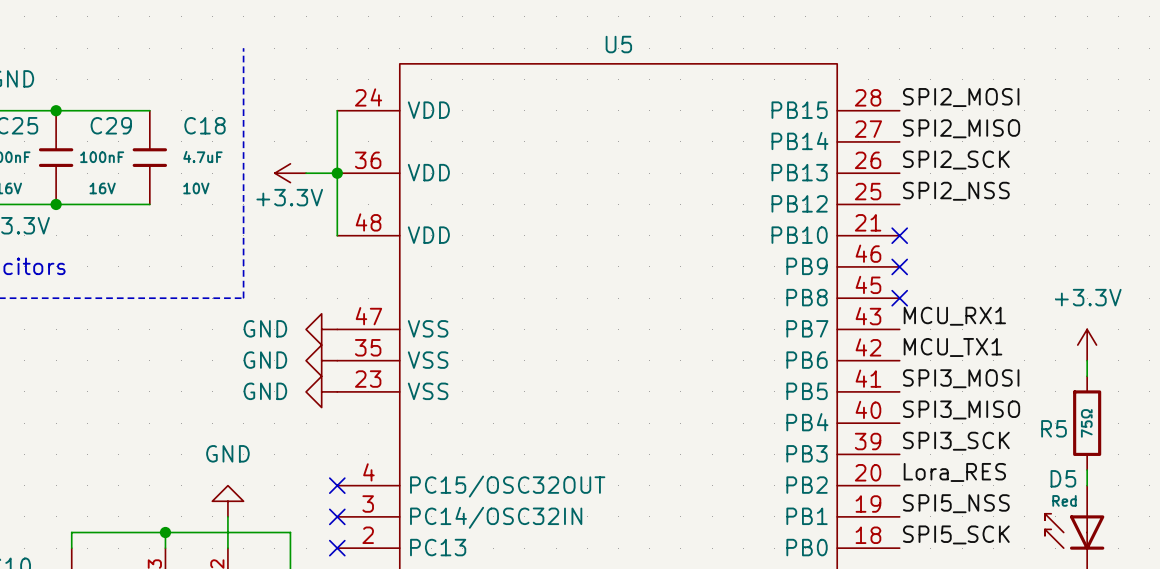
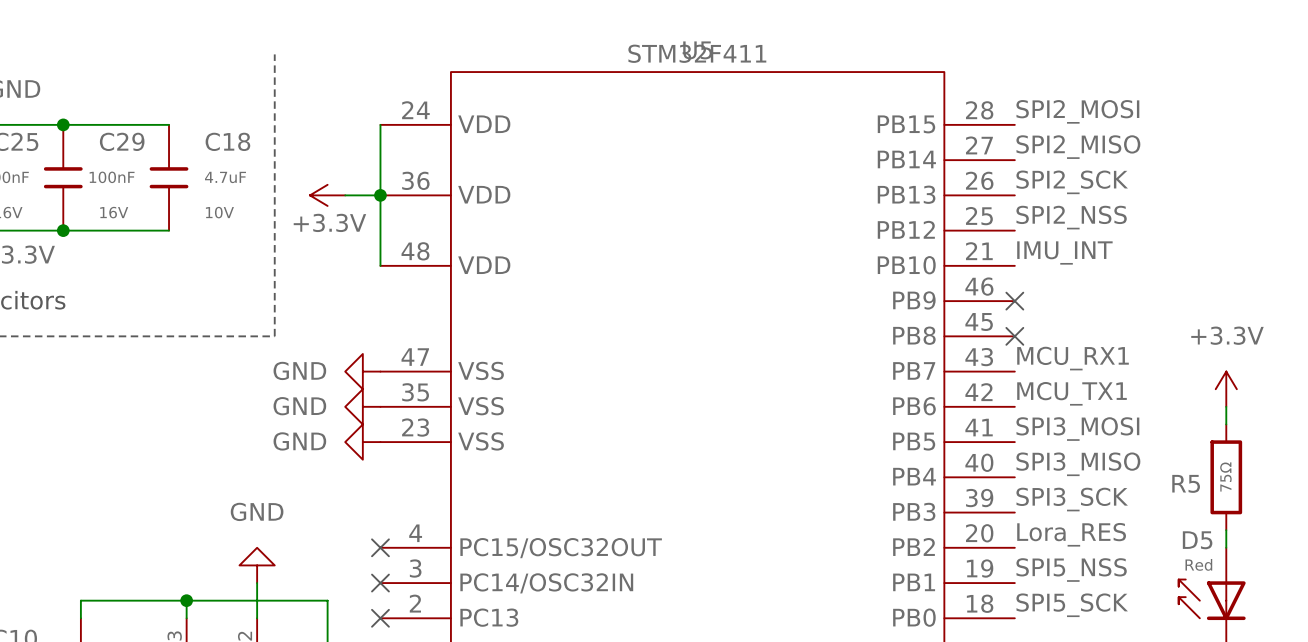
U5 value: none -> STM32F411 (697, 53)
label: none -> IMU_INT (1064, 252)
no-connect mark: (899, 235) -> none

